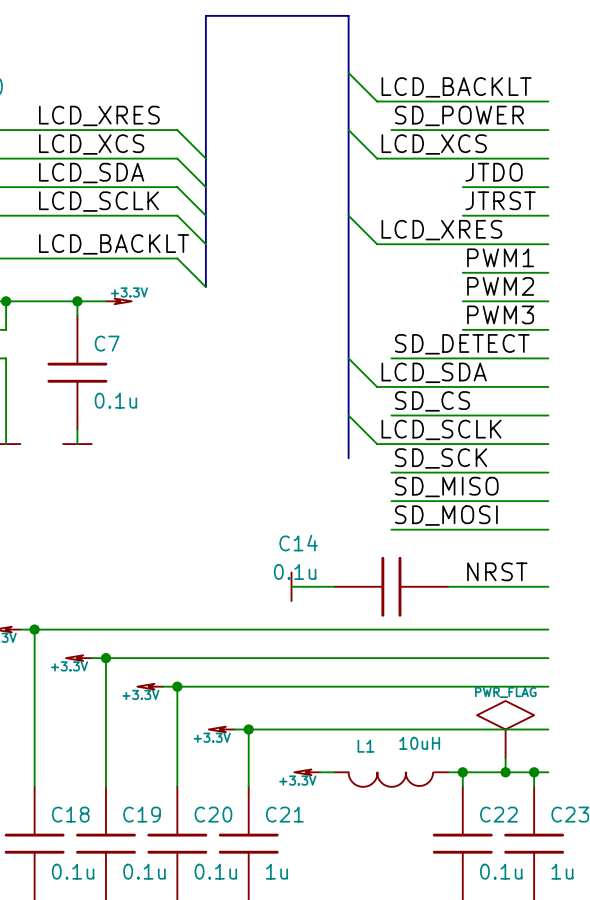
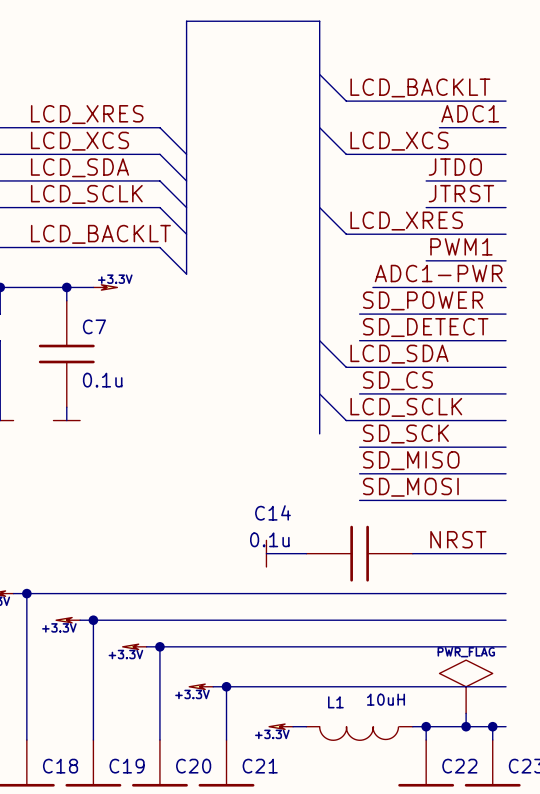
label position: SD_POWER (459, 115) -> SD_POWER (423, 300)
label: none -> ADC1 (470, 113)
wire: (391, 130) (477, 130) -> none
label: none -> ADC1-PWR (438, 273)
label: PWM2 (500, 286) -> none
wire: none -> (372, 287) (426, 287)
label: PWM3 (500, 314) -> none
wire: none -> (359, 314) (426, 314)

